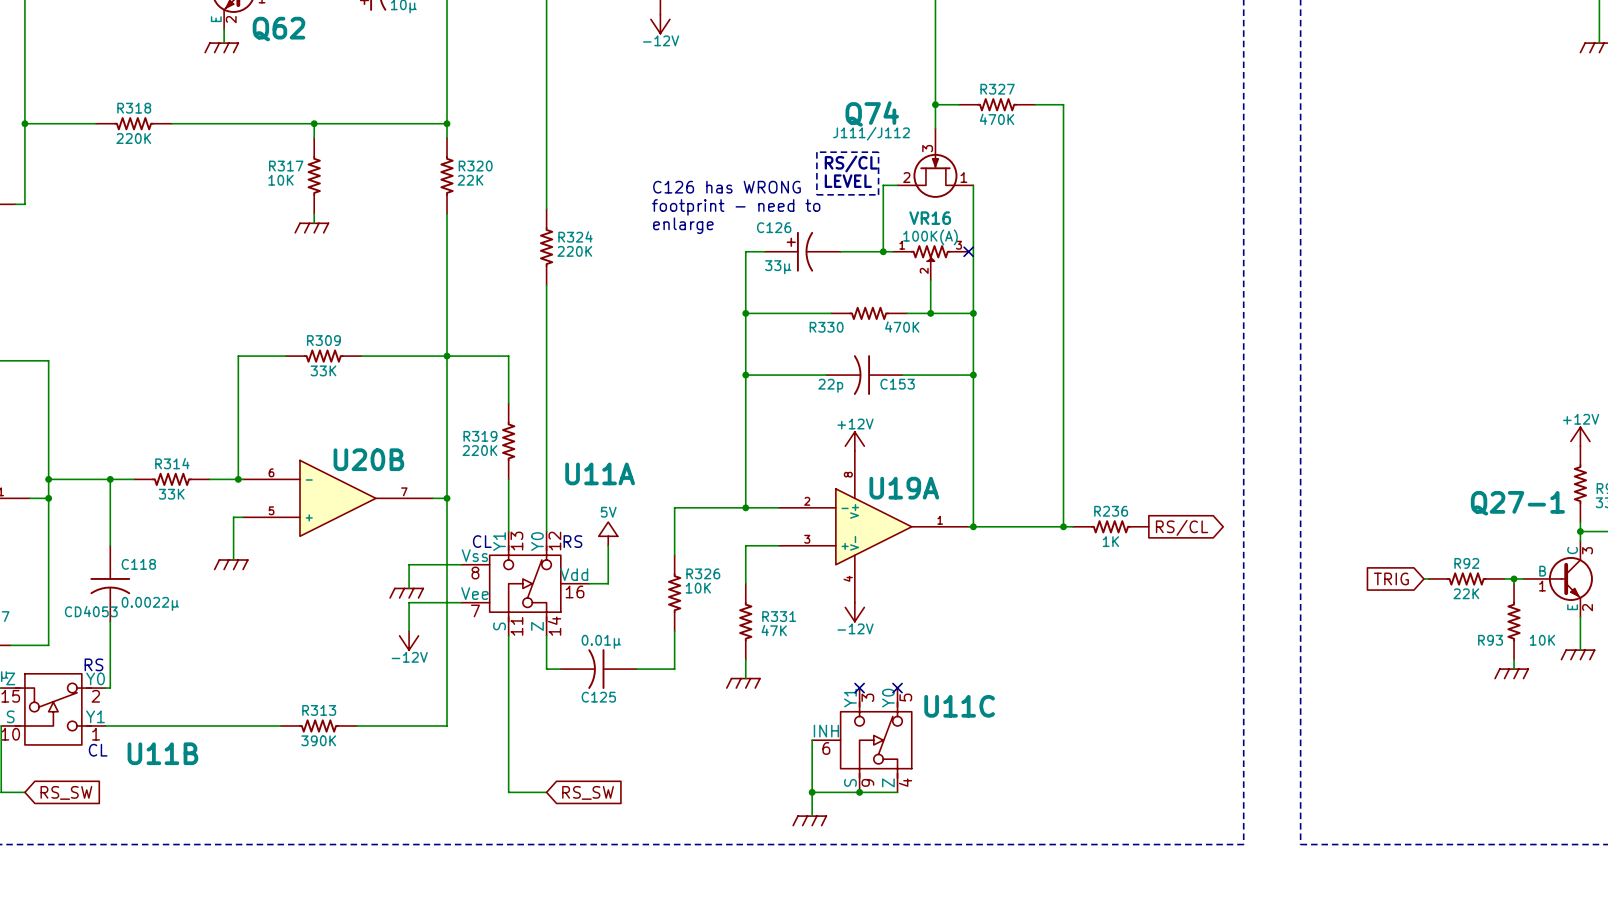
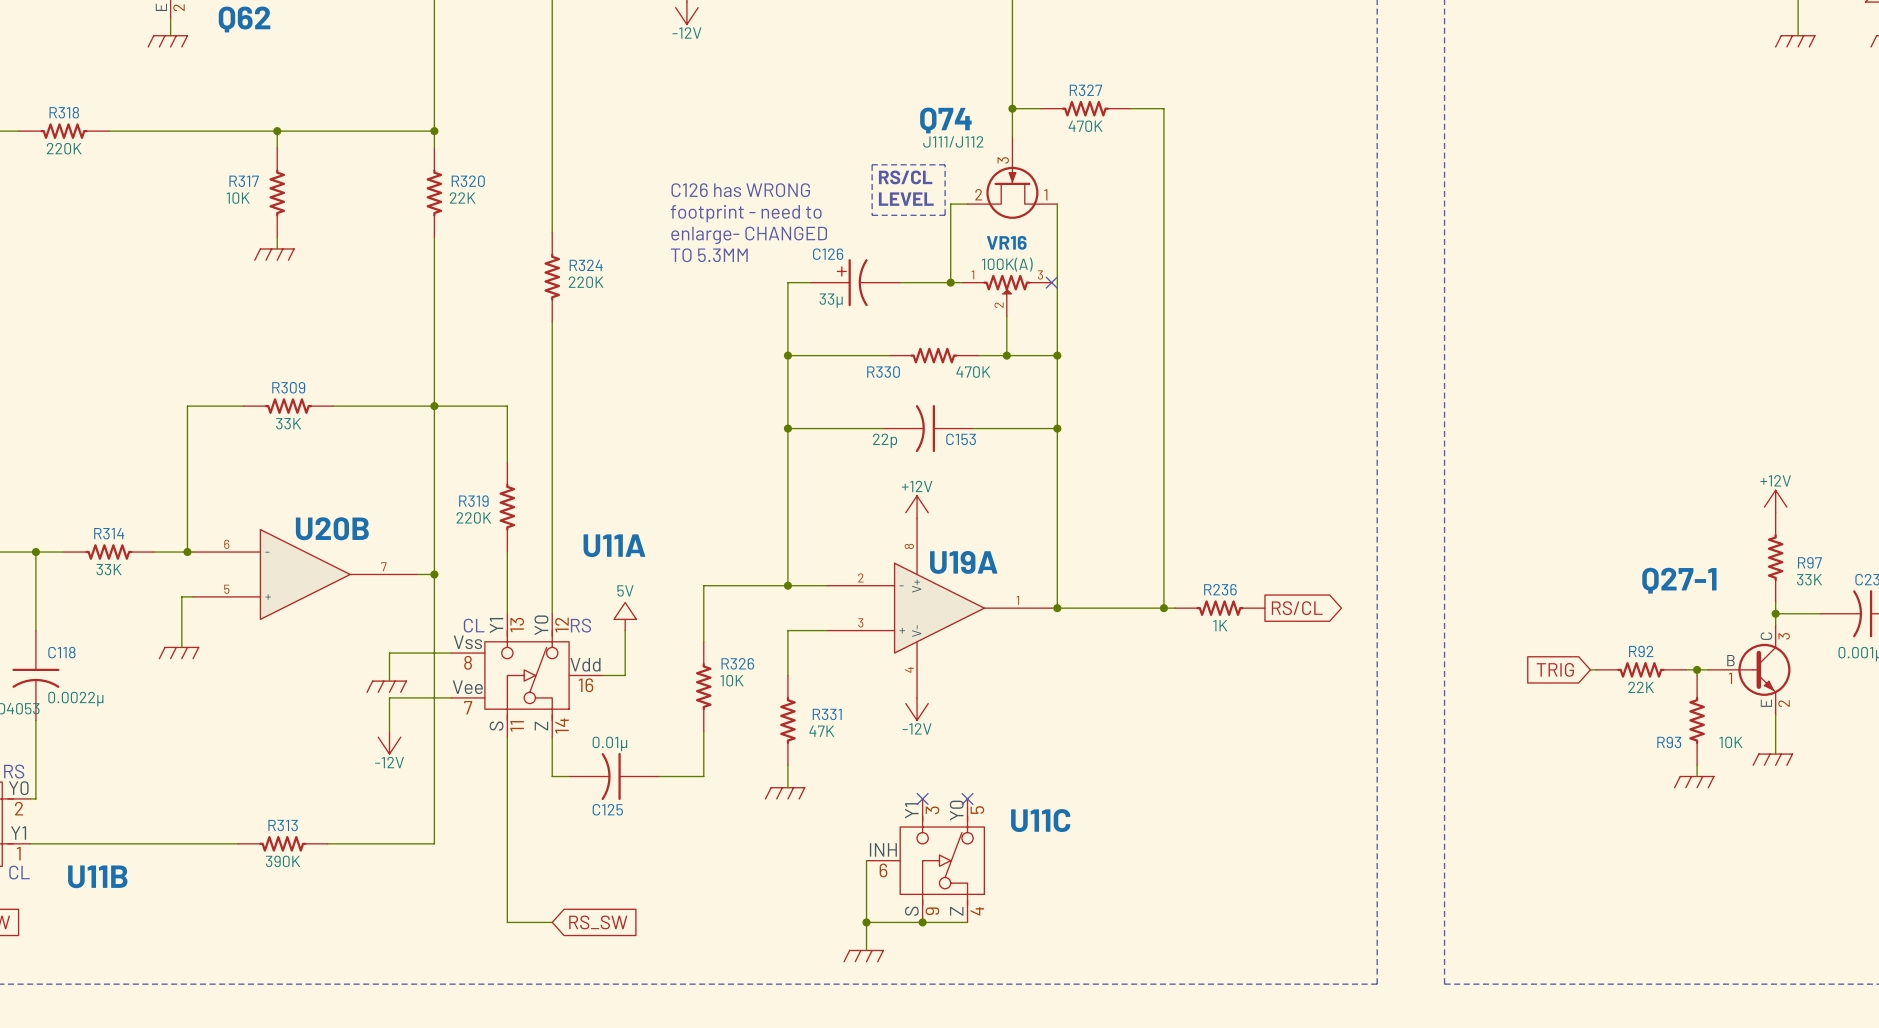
text: none -> C126 has WRONG (740, 190)
text: C126 has WRONG (727, 187) -> footprint - need to (746, 213)
text: footprint - need to (736, 207) -> enlarge- CHANGED (749, 235)
text: enlarge (683, 225) -> TO 5.3MM (709, 255)

